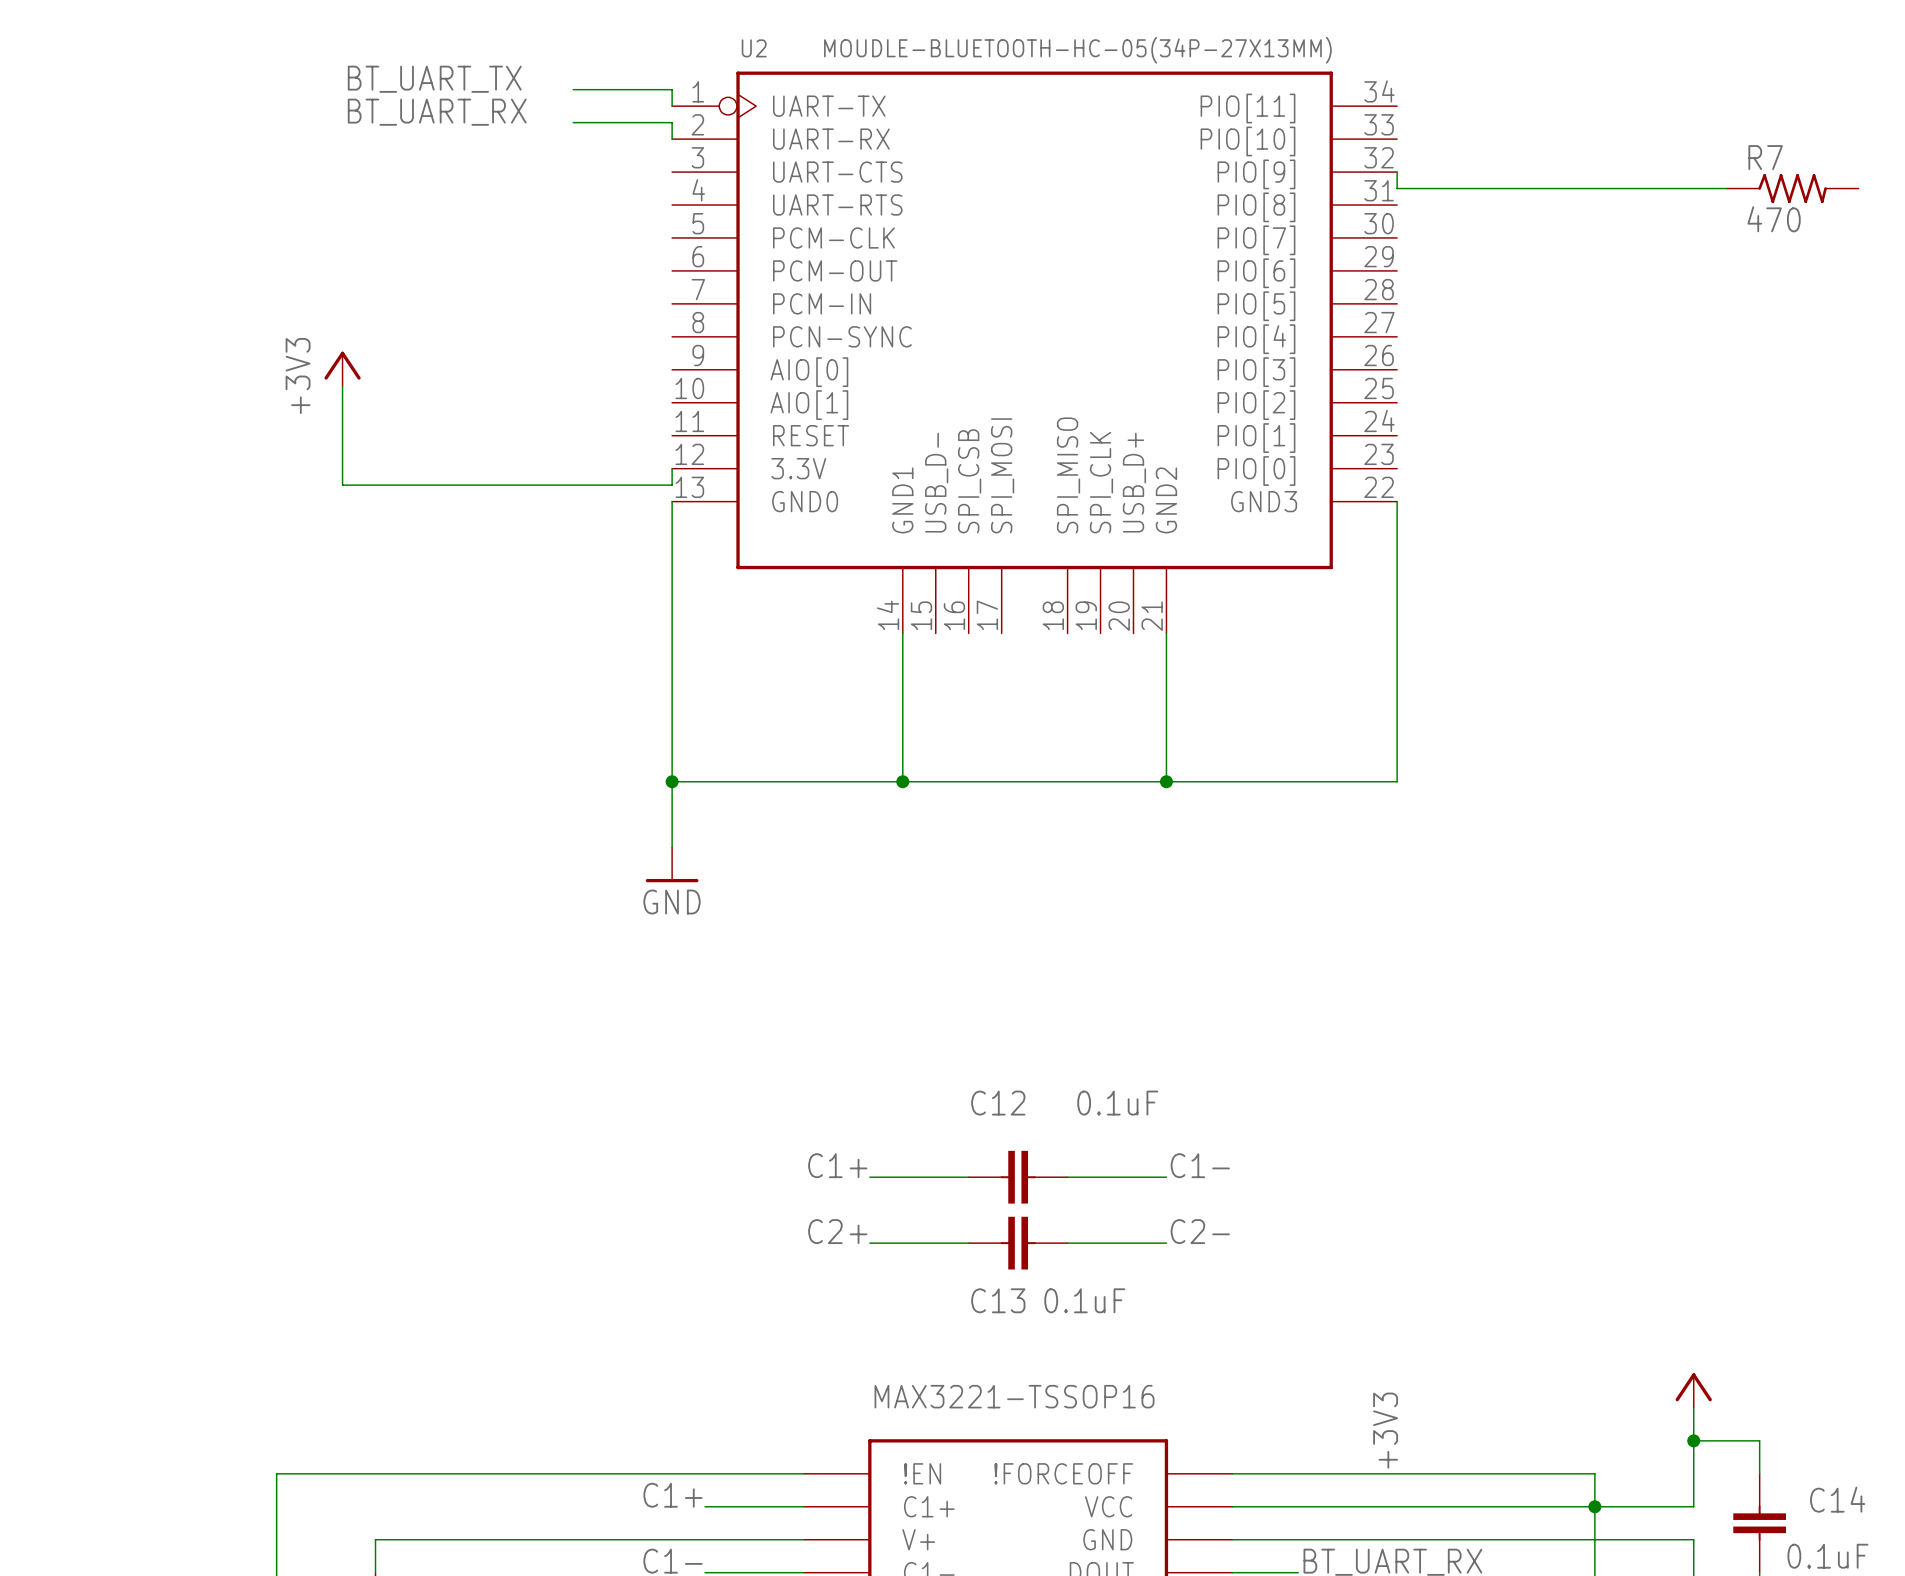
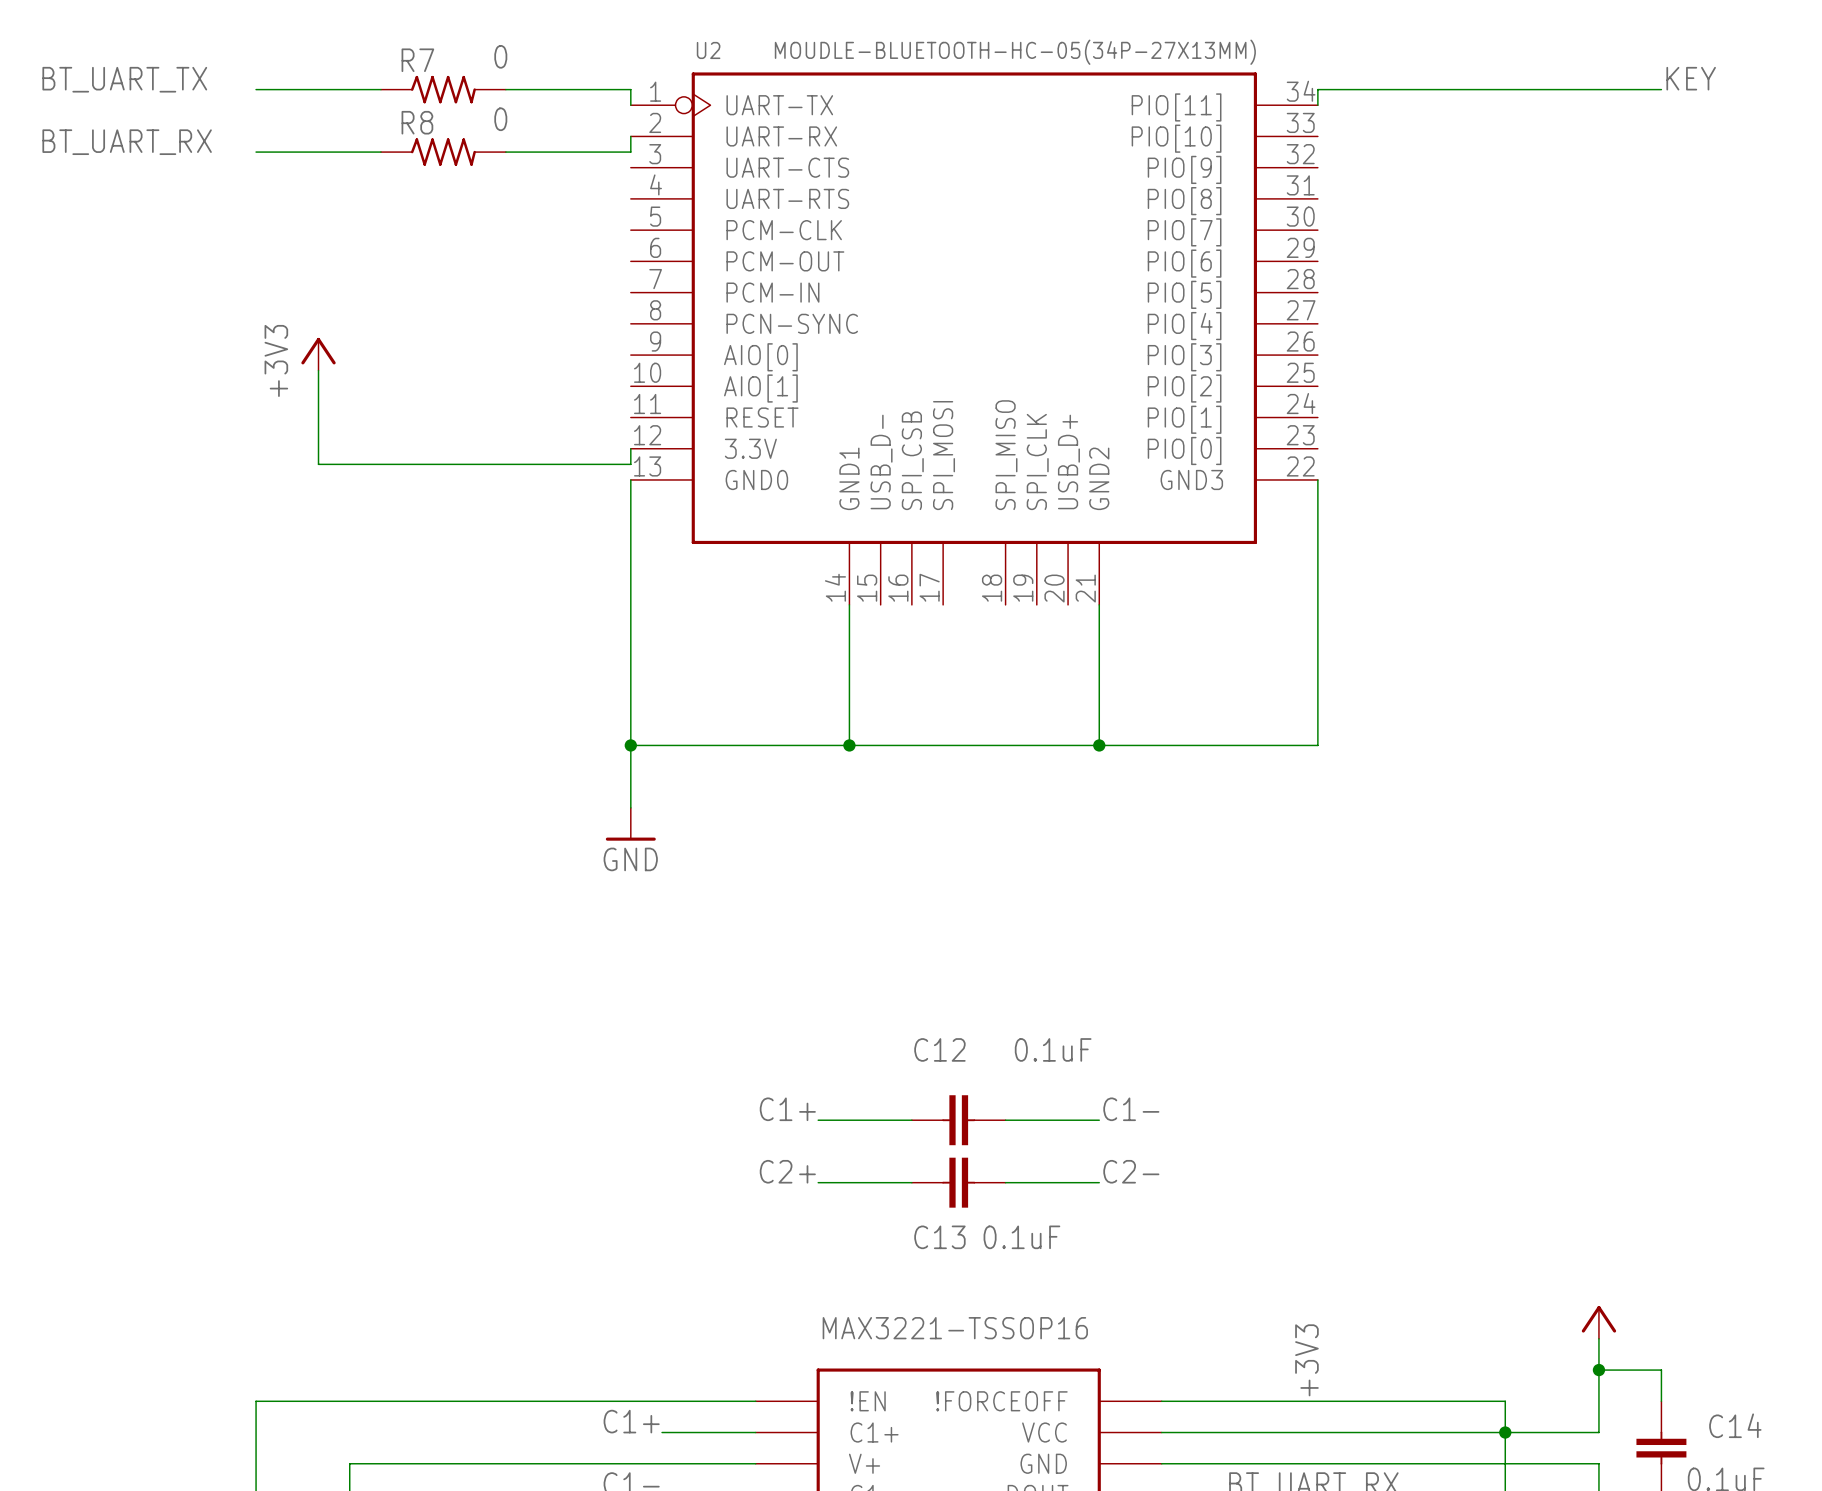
label: none -> KEY (1691, 78)
label position: BT_UART_TX (434, 79) -> BT_UART_TX (124, 79)
wire: none -> (256, 89) (380, 89)
wire: none -> (505, 89) (537, 89)
wire: none -> (1661, 89) (1317, 89) (1317, 105)
label position: BT_UART_RX (437, 112) -> BT_UART_RX (127, 142)
wire: (573, 122) (672, 122) (672, 139) -> (505, 152) (630, 152) (630, 136)
wire: none -> (256, 152) (380, 152)
R8: none -> 0 (443, 152)
wire: (1397, 172) (1397, 188) (1726, 188) -> none
R7 position: (1792, 188) -> (443, 89)
R7 value: 470 (1774, 219) -> 0 (500, 56)

